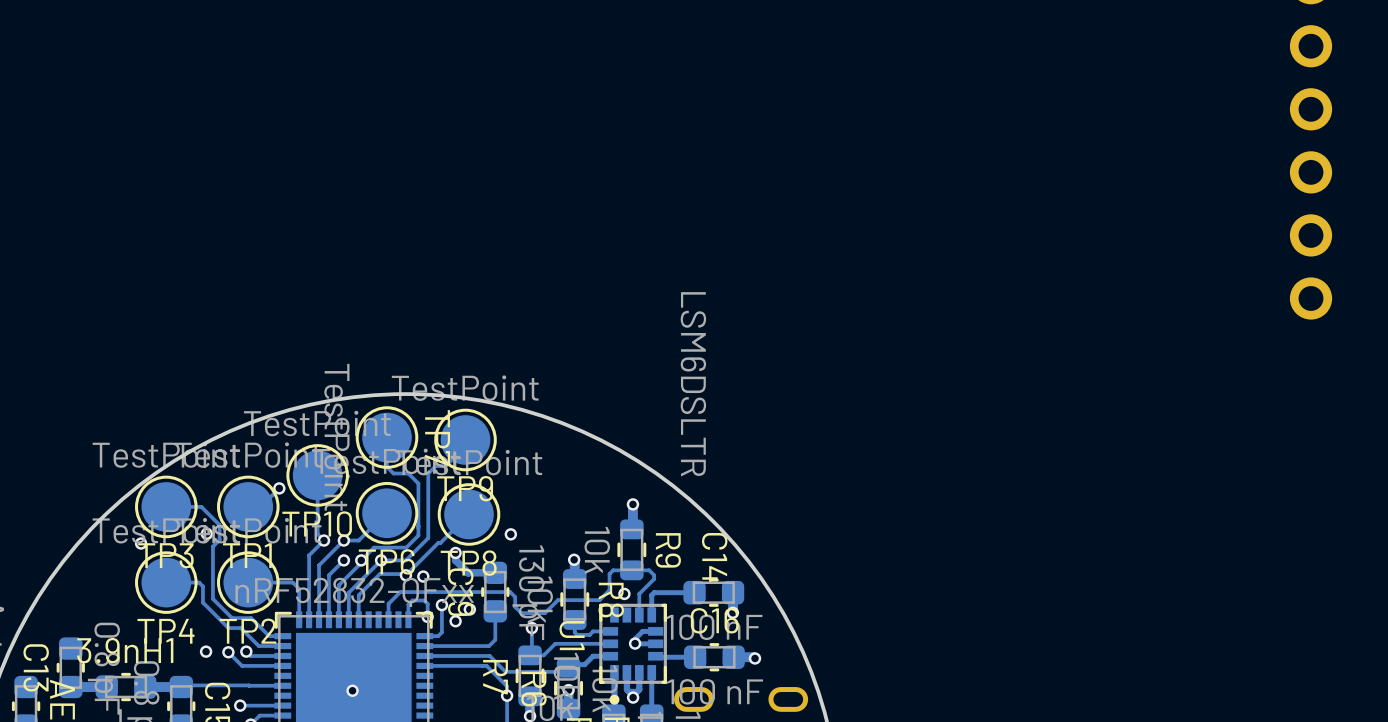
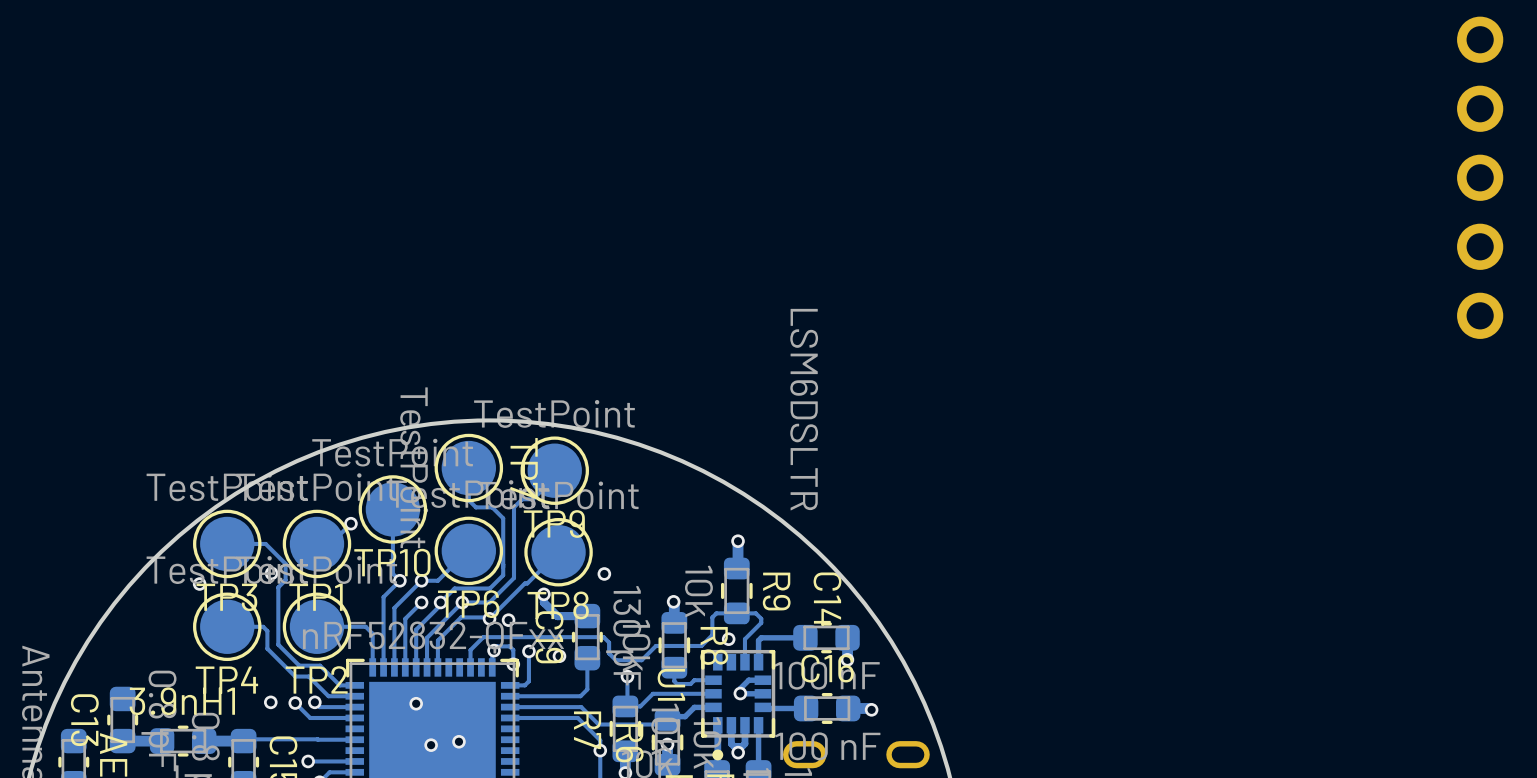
via position: (455, 621) -> (494, 650)
via: none -> (416, 703)
via: none -> (458, 741)

